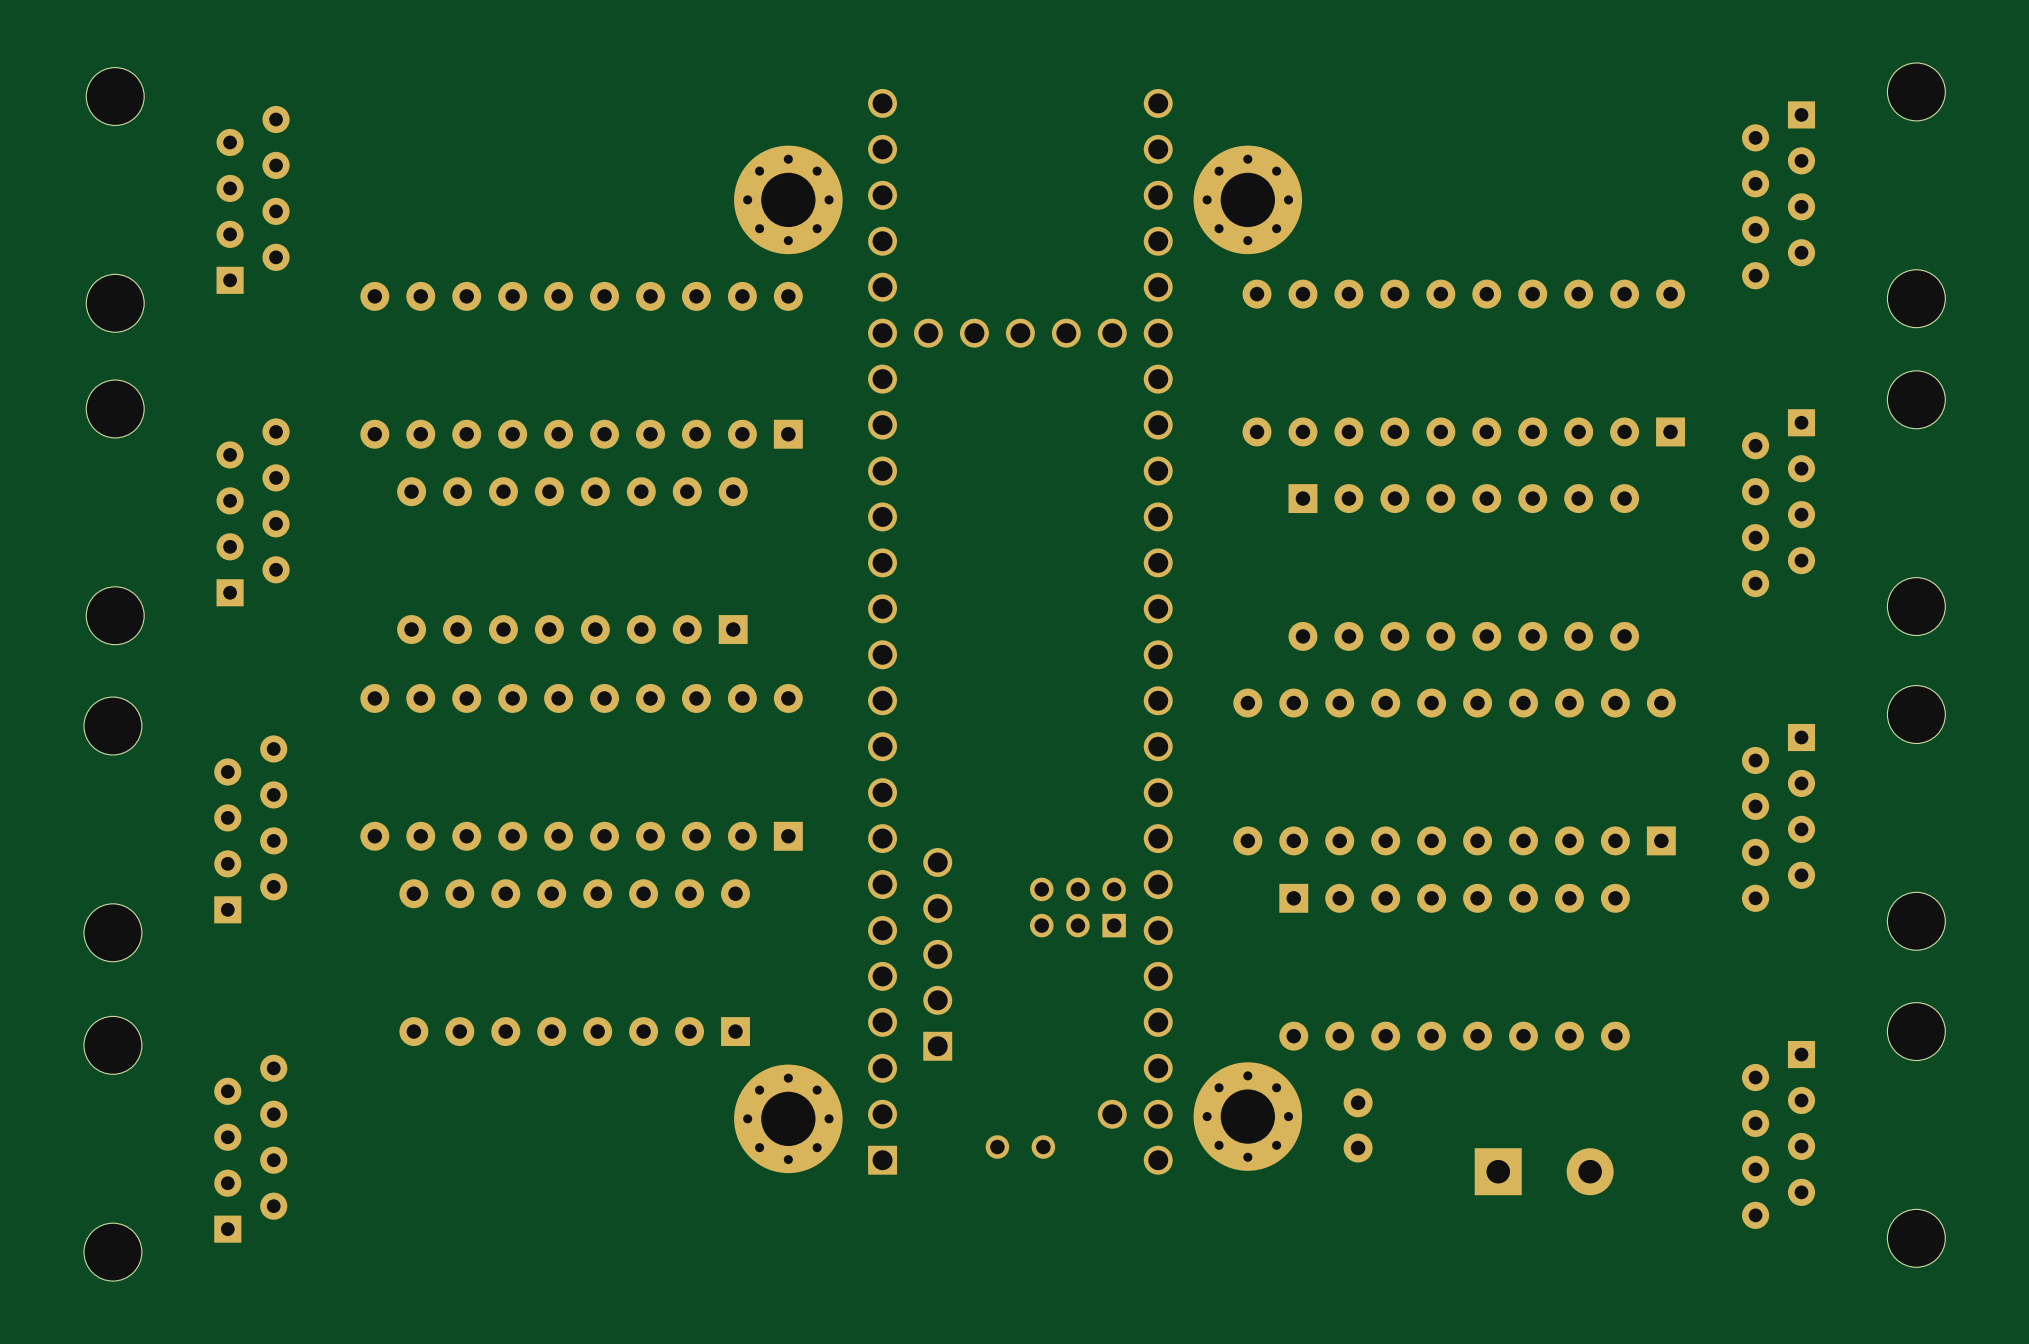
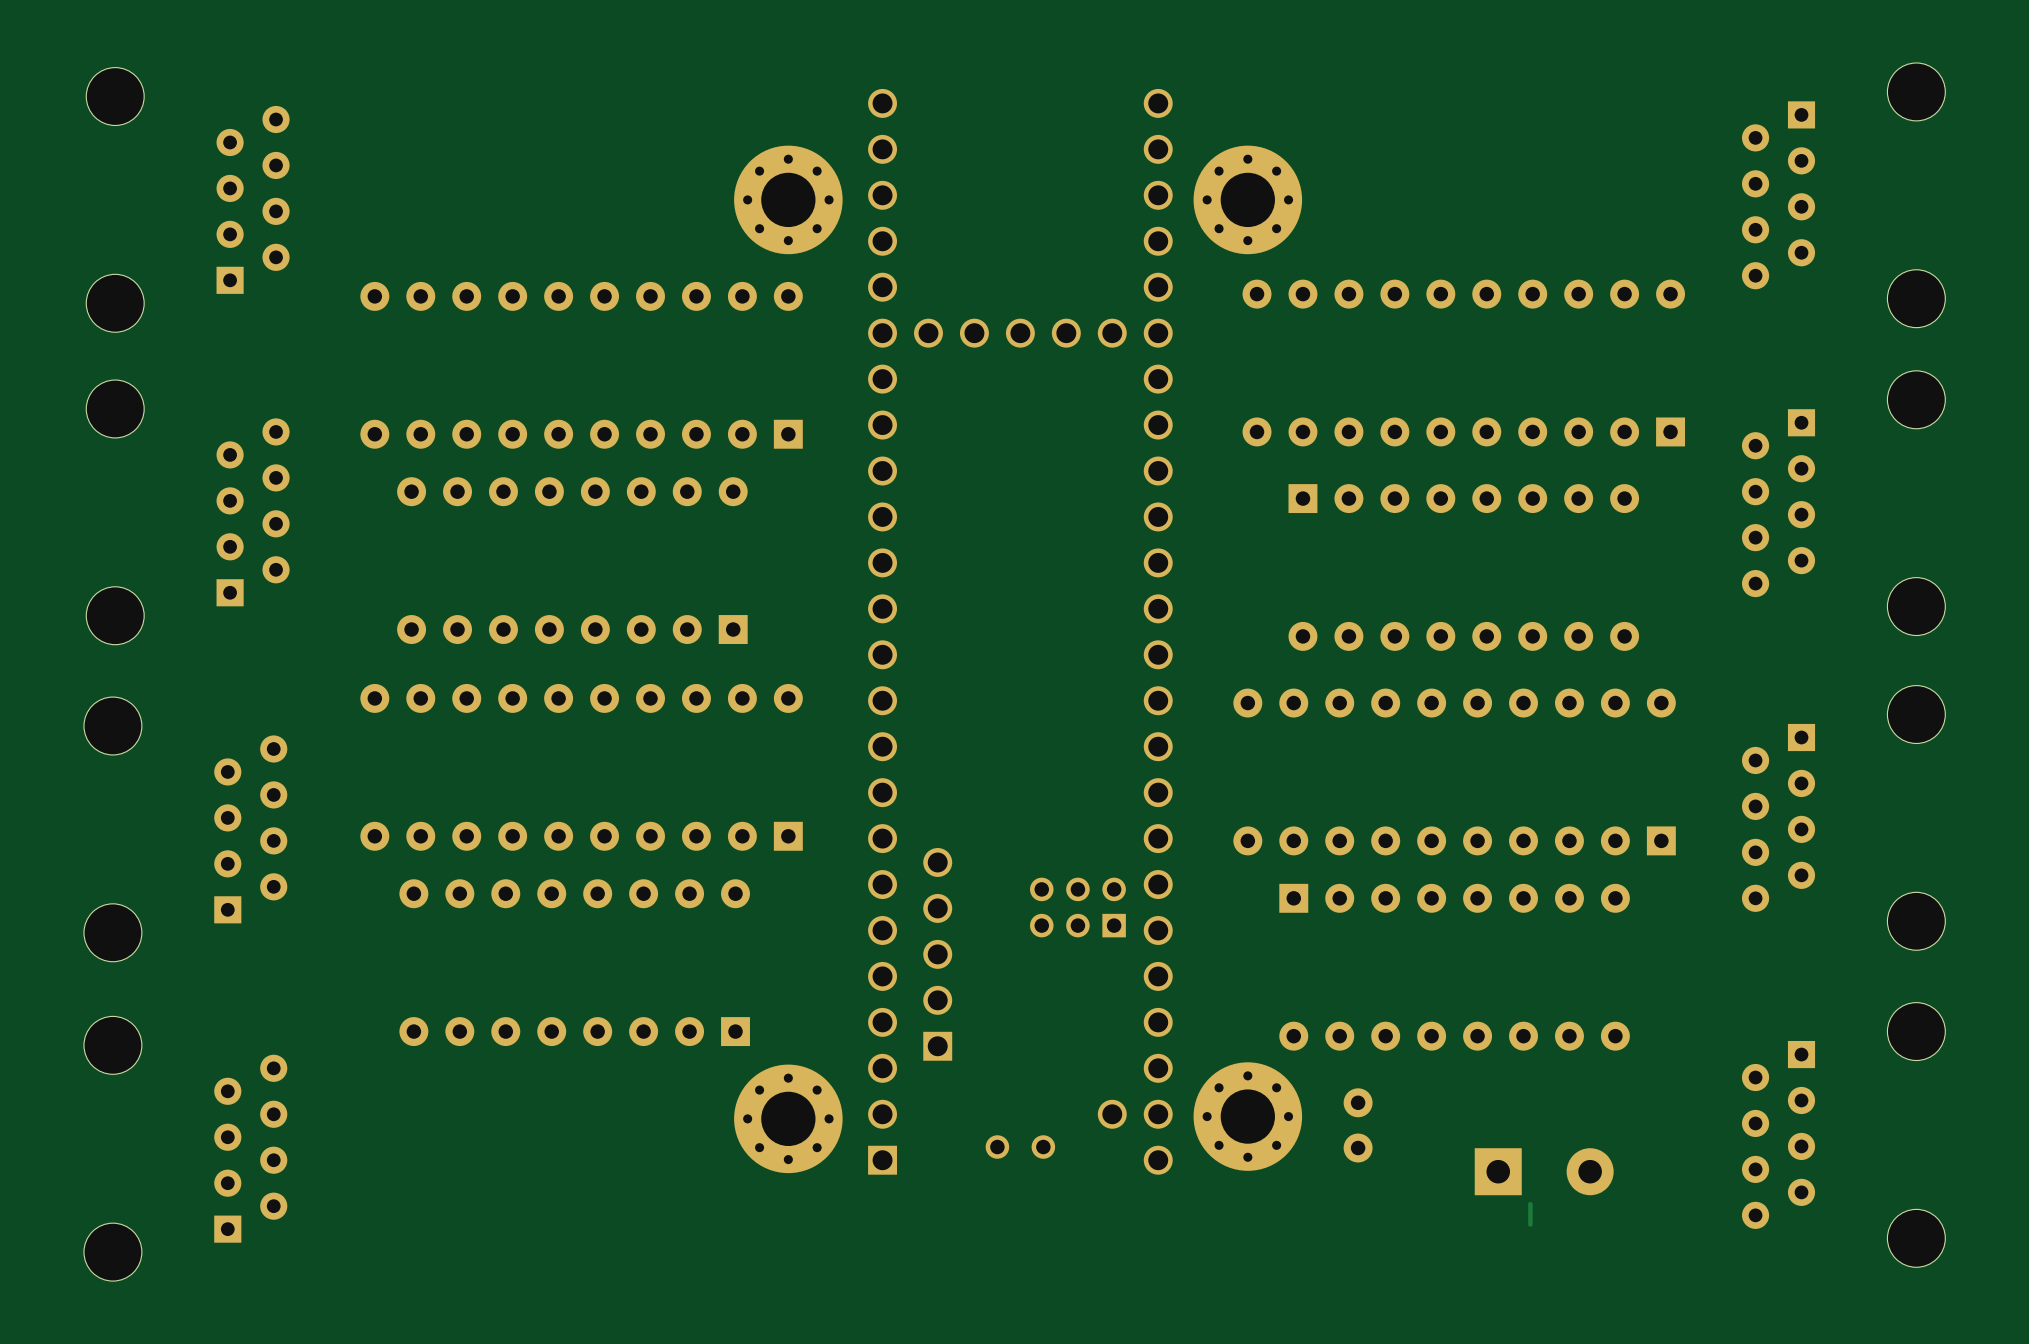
track: none -> (1530, 1204) (1530, 1224)

